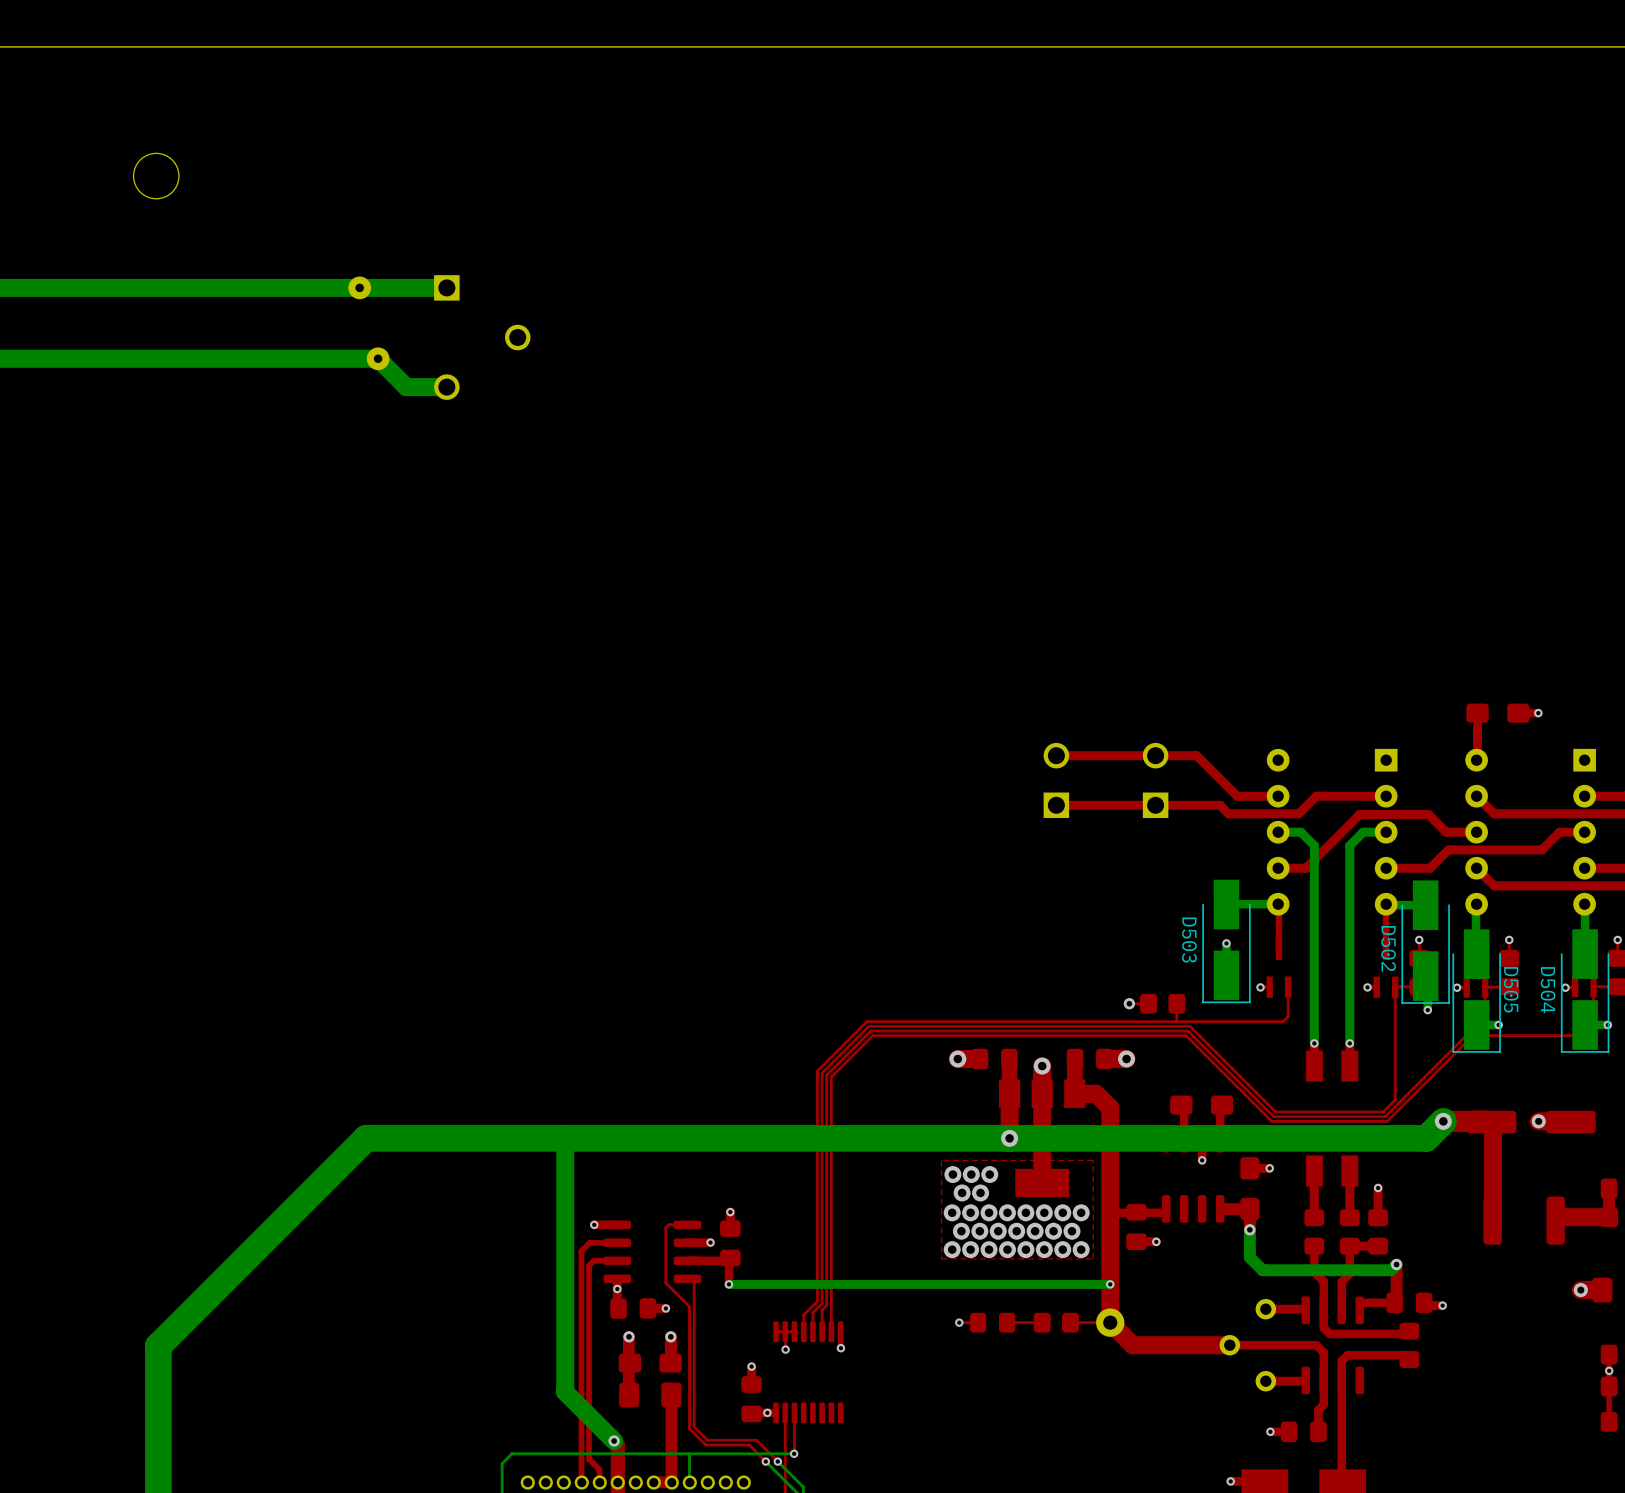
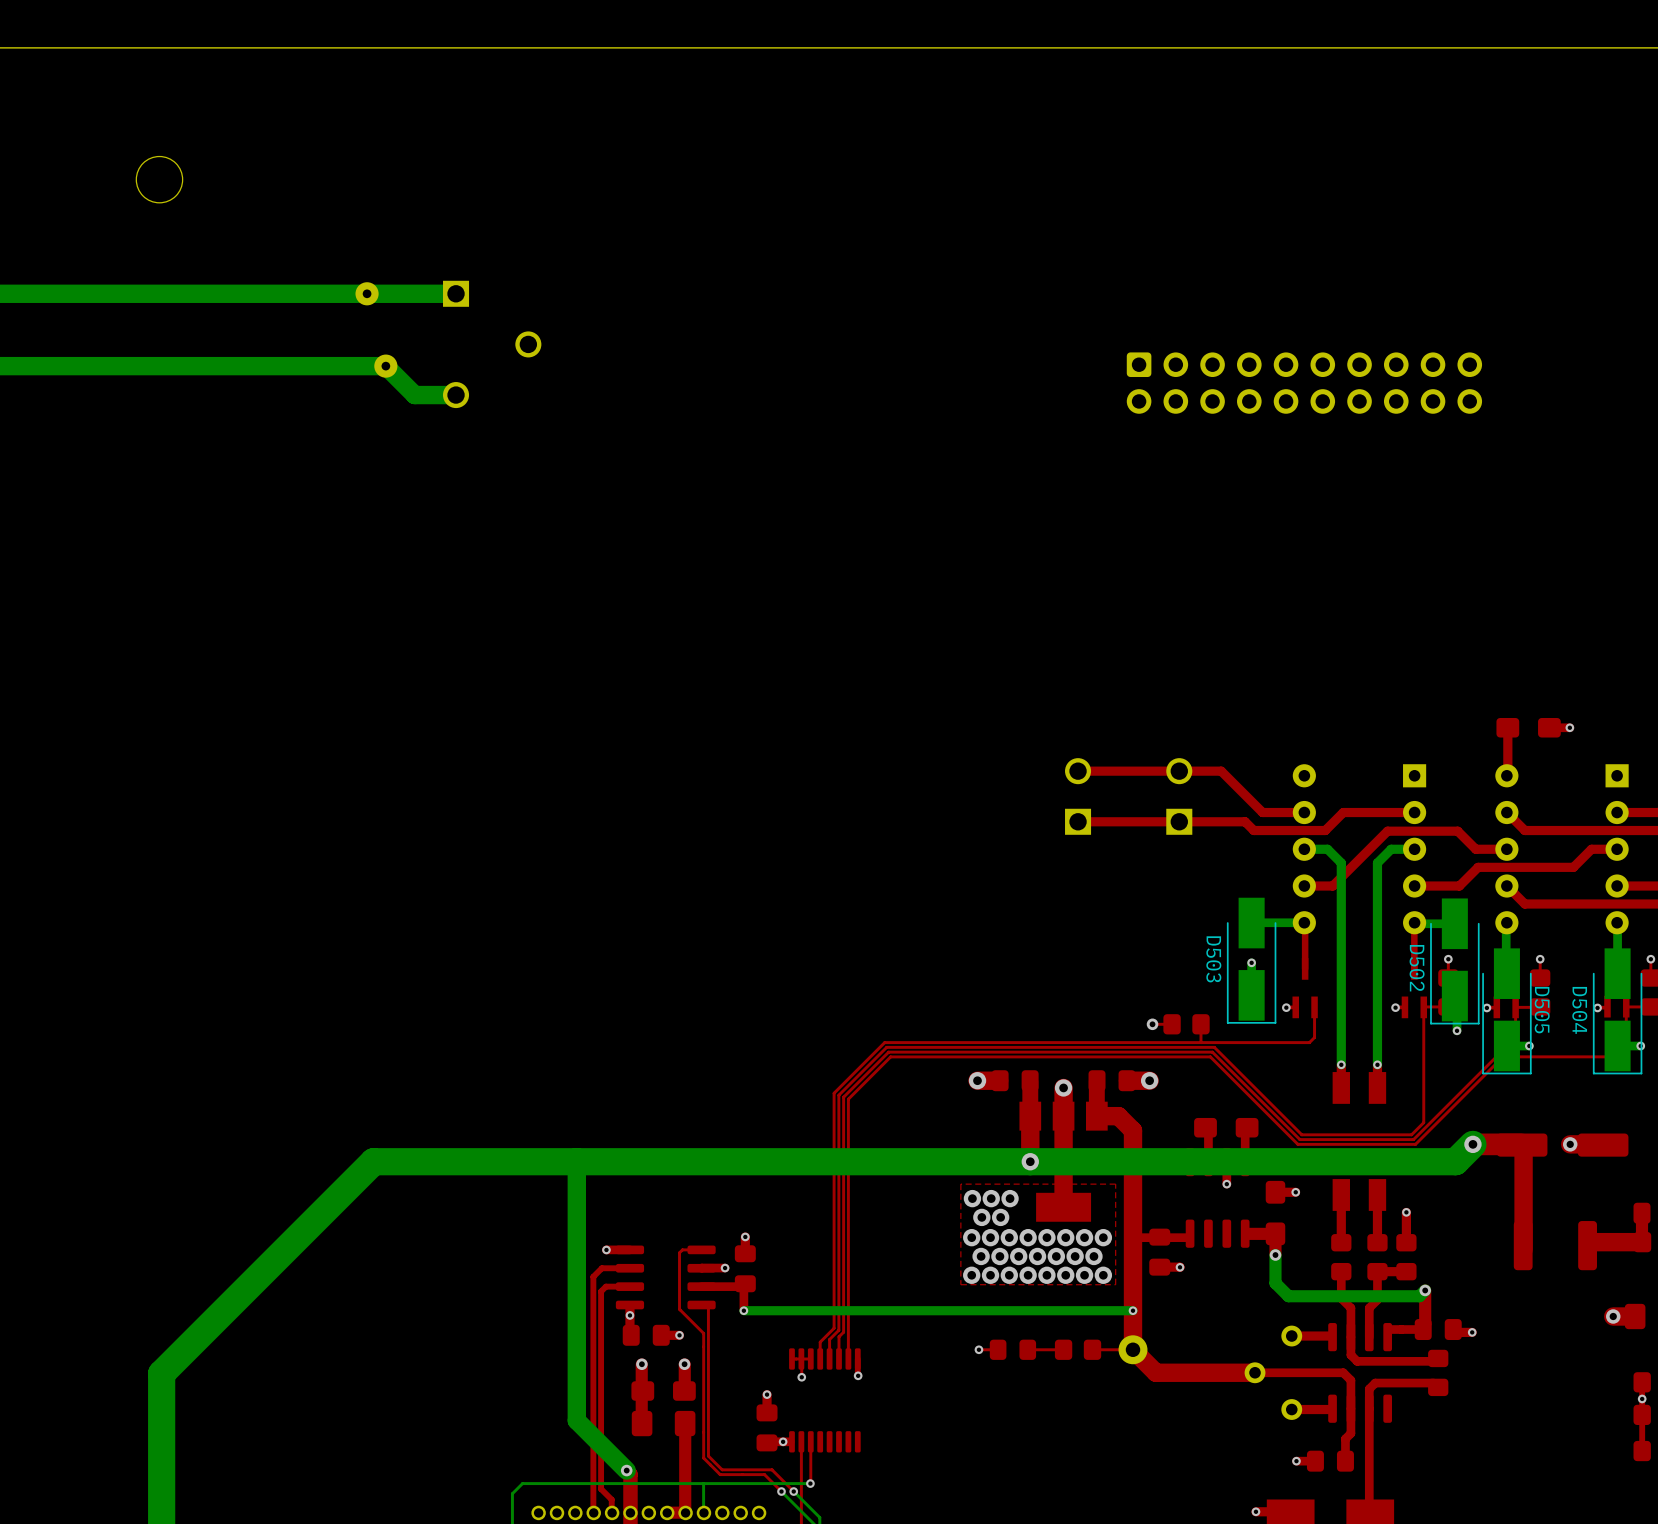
part: none -> (1304, 383)

